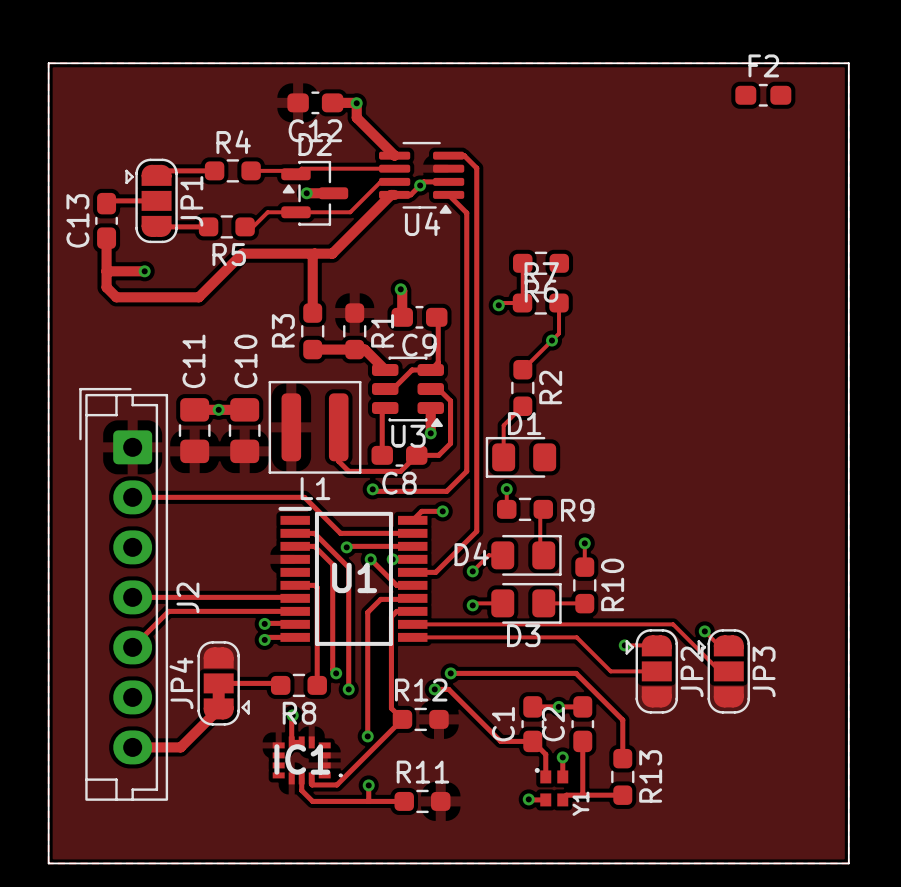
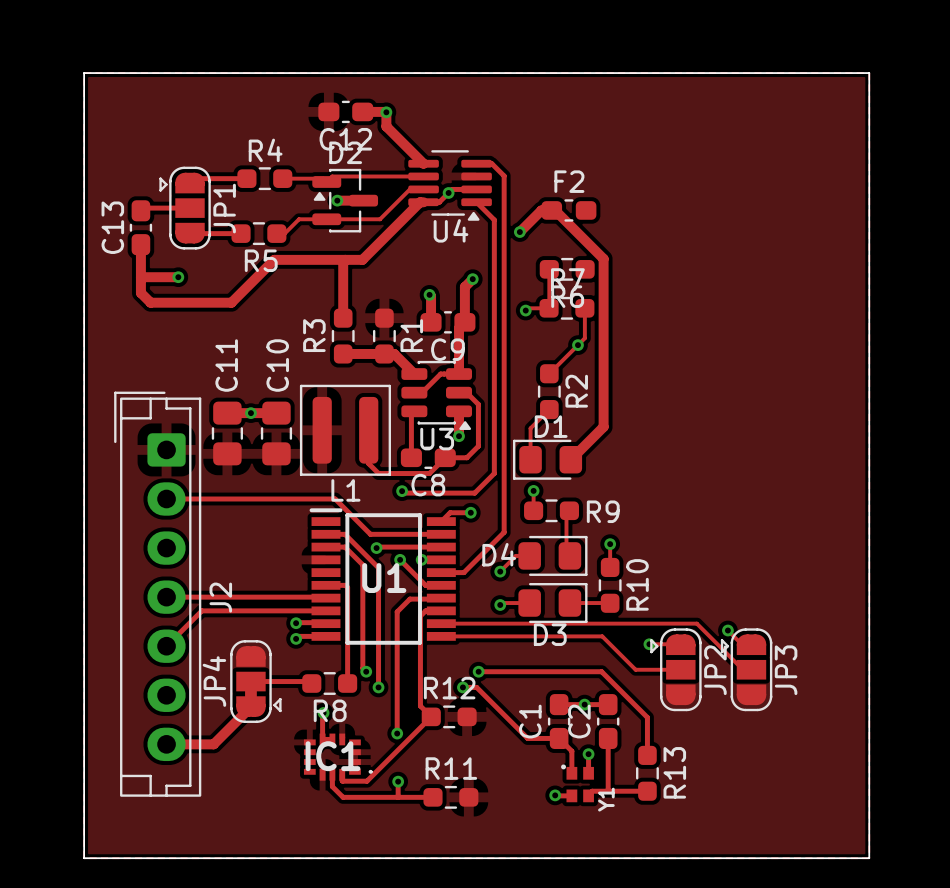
F2 position: (763, 95) -> (568, 210)
track: none -> (519, 232) (541, 210) (555, 210) (603, 258) (603, 426) (570, 459)
via: none -> (519, 232)
via: none -> (472, 279)
track: (438, 321) (438, 362) (430, 370) -> (472, 279) (464, 287) (464, 322) (459, 328) (459, 374)

